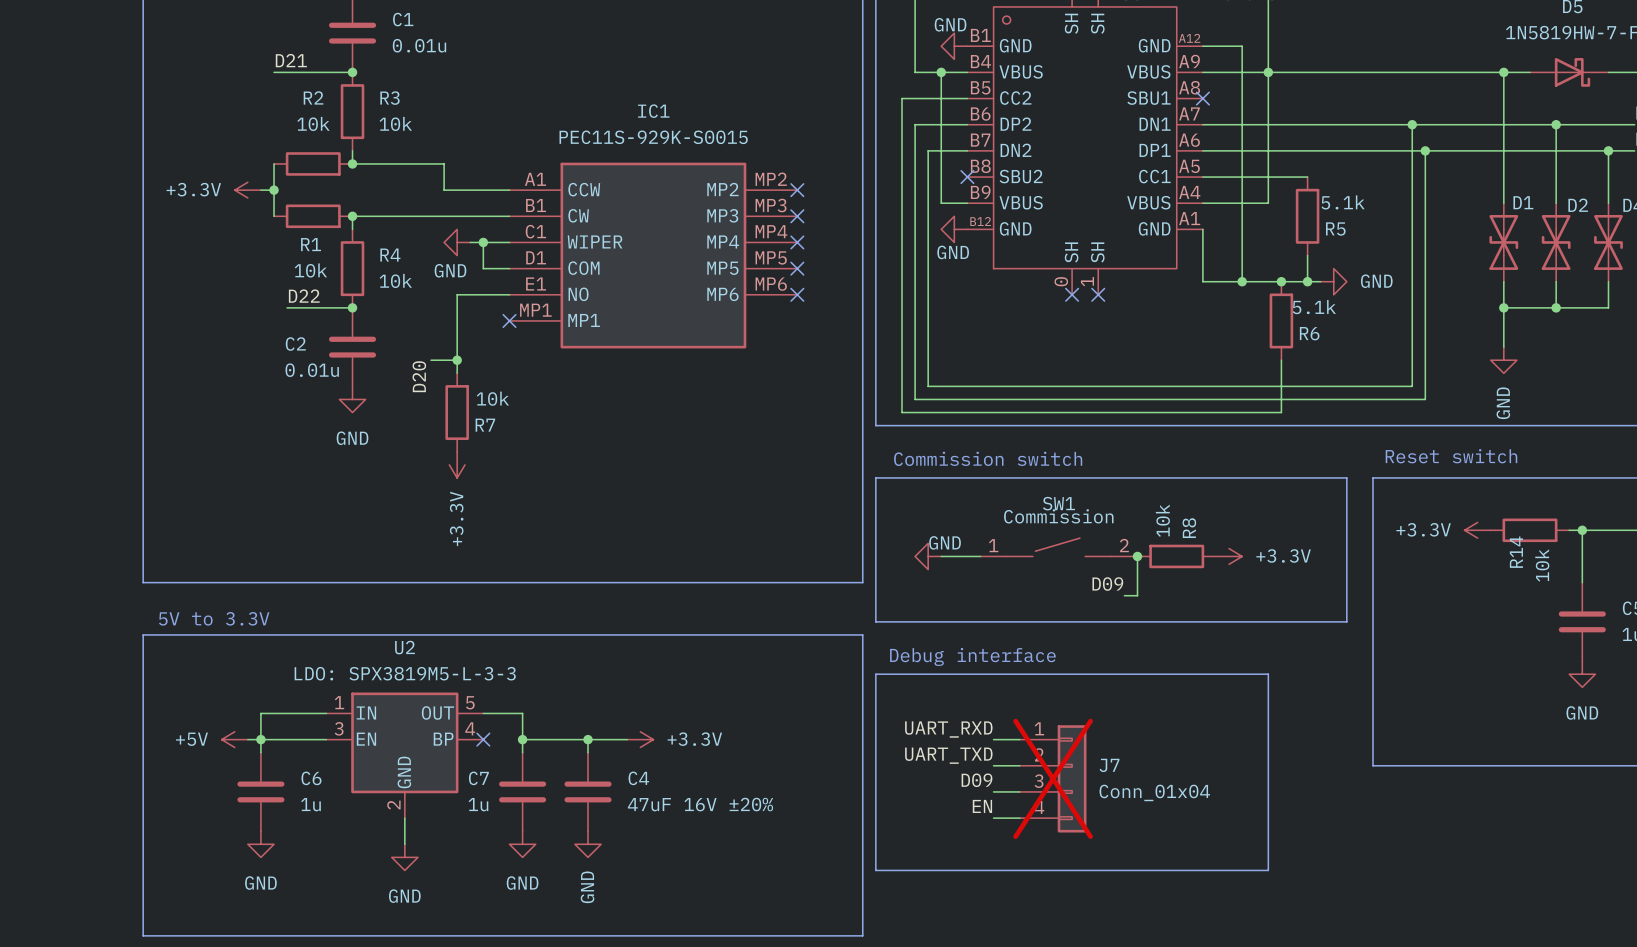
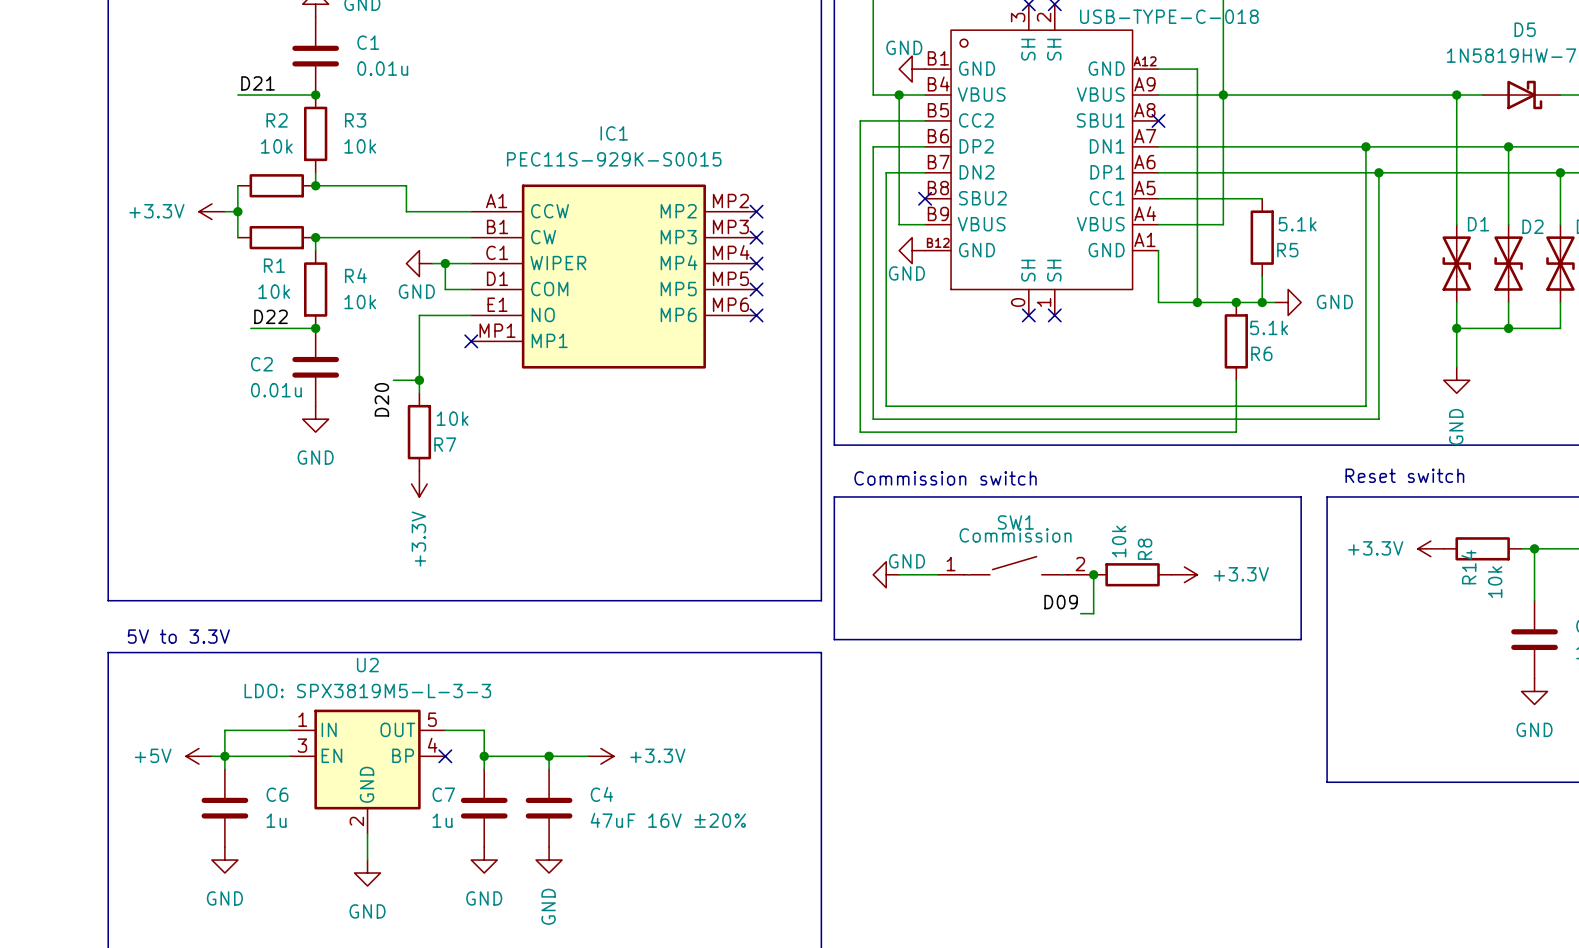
text: Debug interface (972, 656) -> none
line: (875, 674) (1268, 674) (1268, 870) (875, 870) (875, 674) -> none
label: UART_RXD (948, 729) -> none
wire: (993, 739) (1019, 739) -> none
label: UART_TXD (948, 755) -> none
wire: (993, 765) (1019, 765) -> none
J7: Conn_01x04 (1053, 778) -> none
label: D09 (977, 780) -> none
wire: (993, 791) (1019, 791) -> none
label: EN (982, 806) -> none
wire: (993, 818) (1019, 818) -> none

